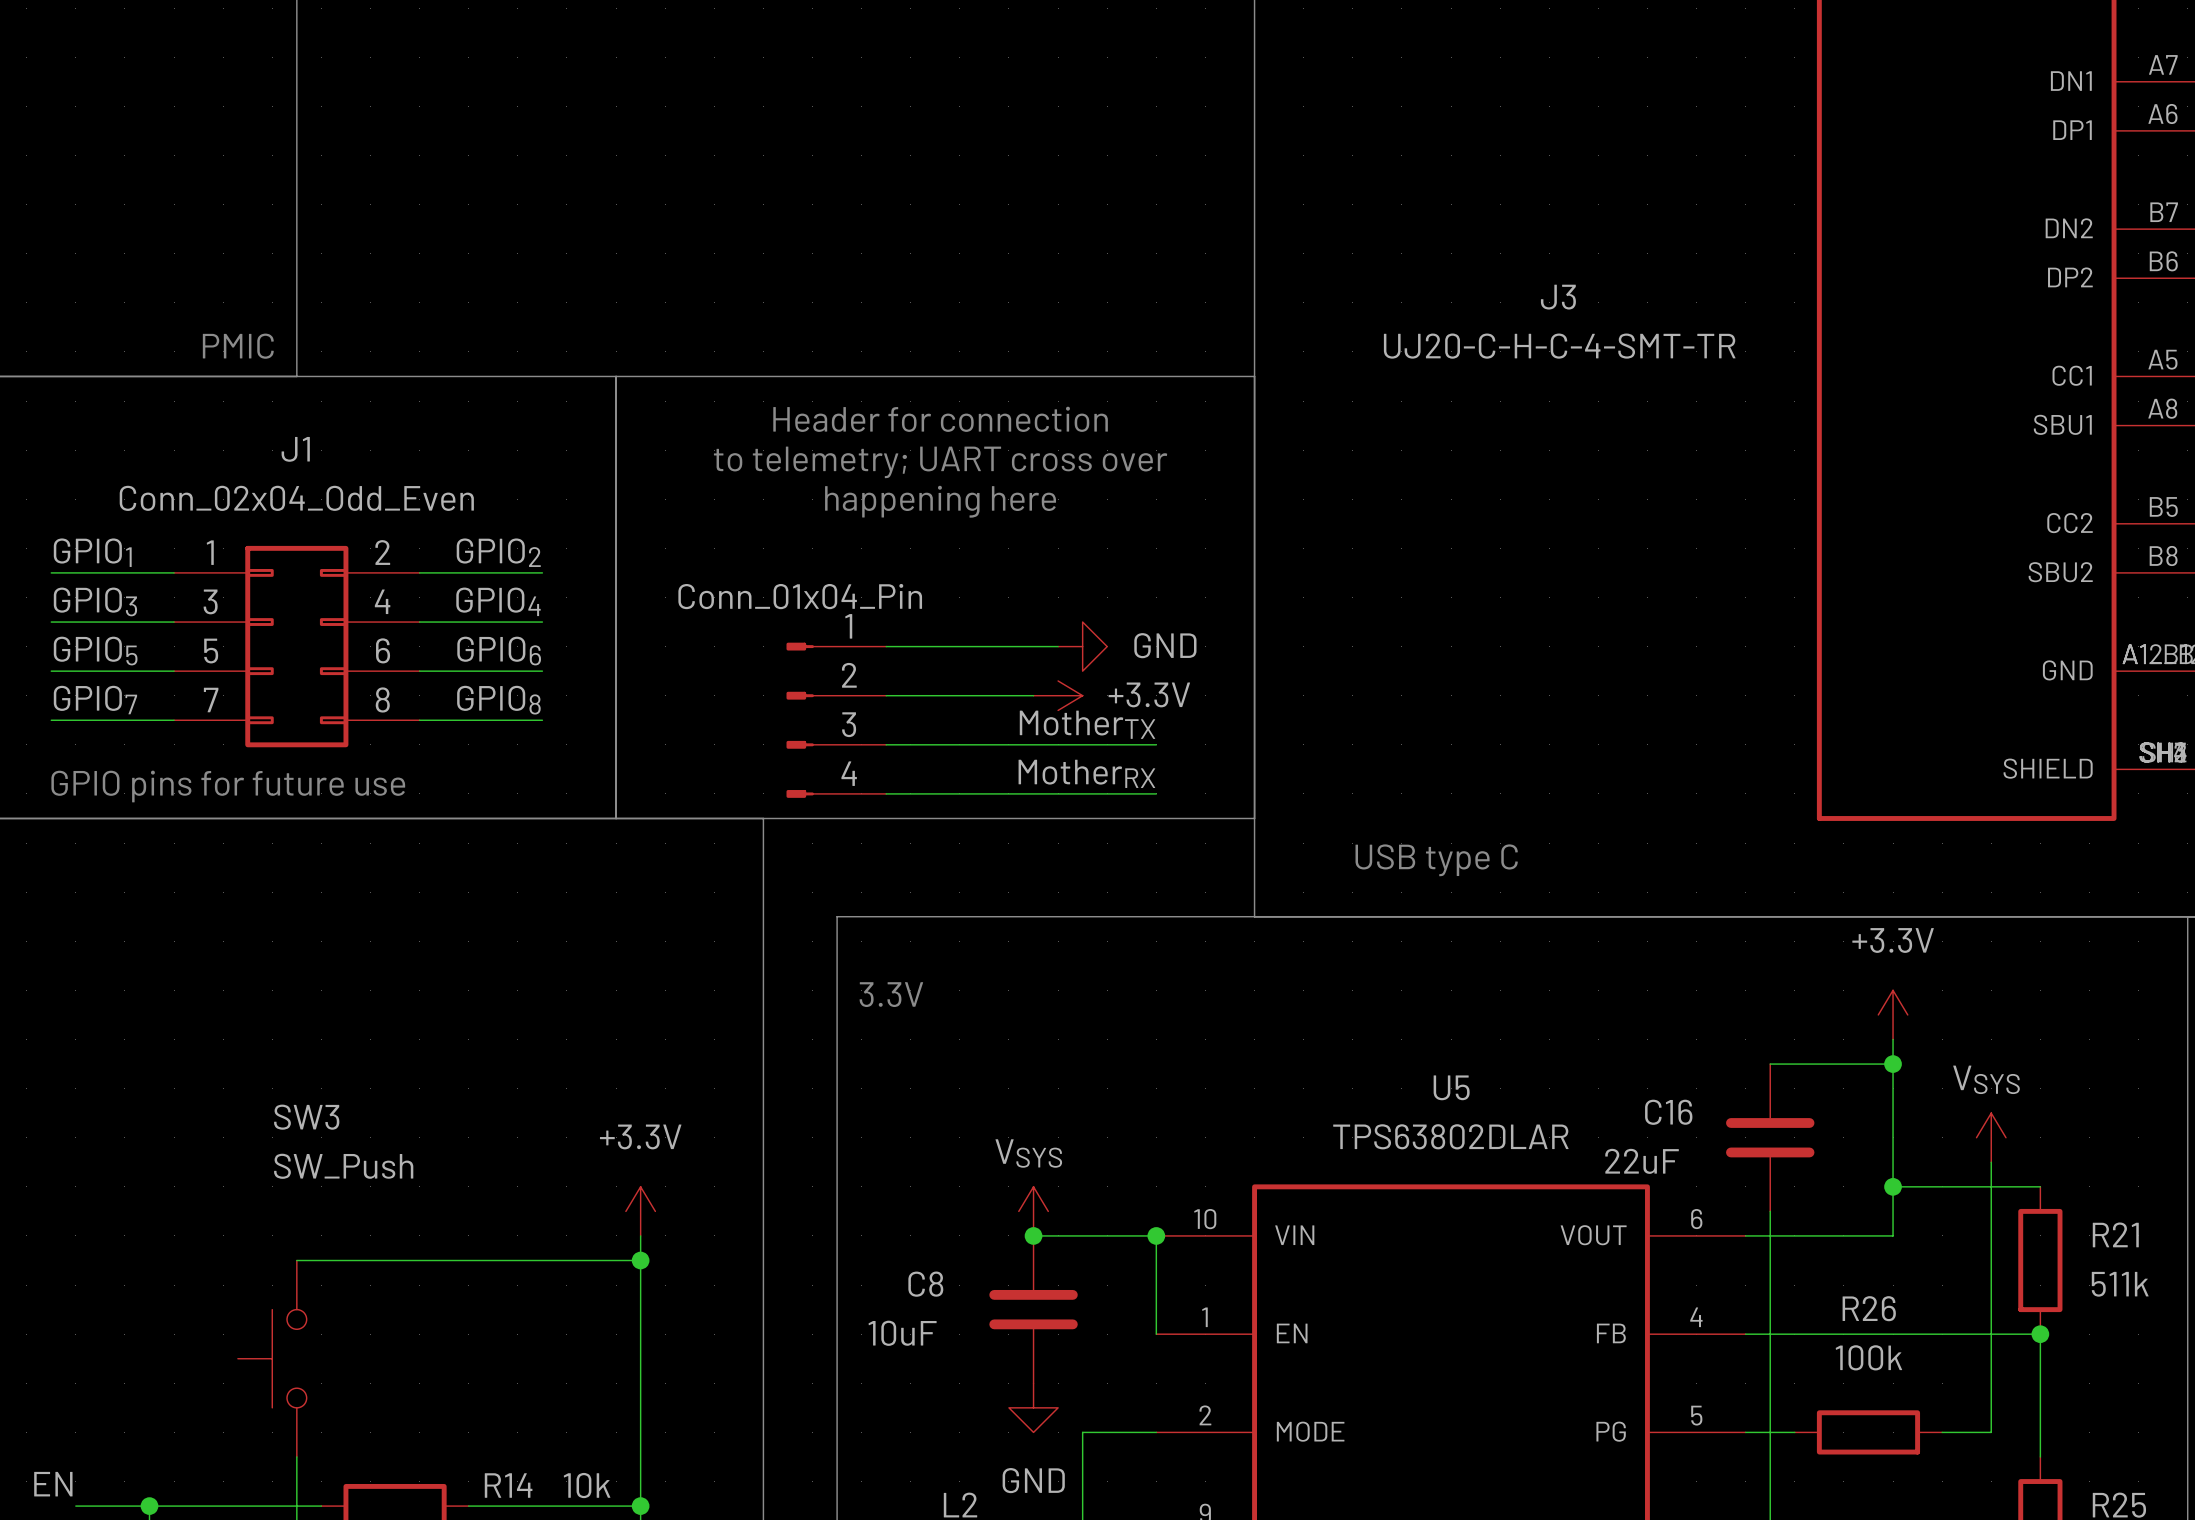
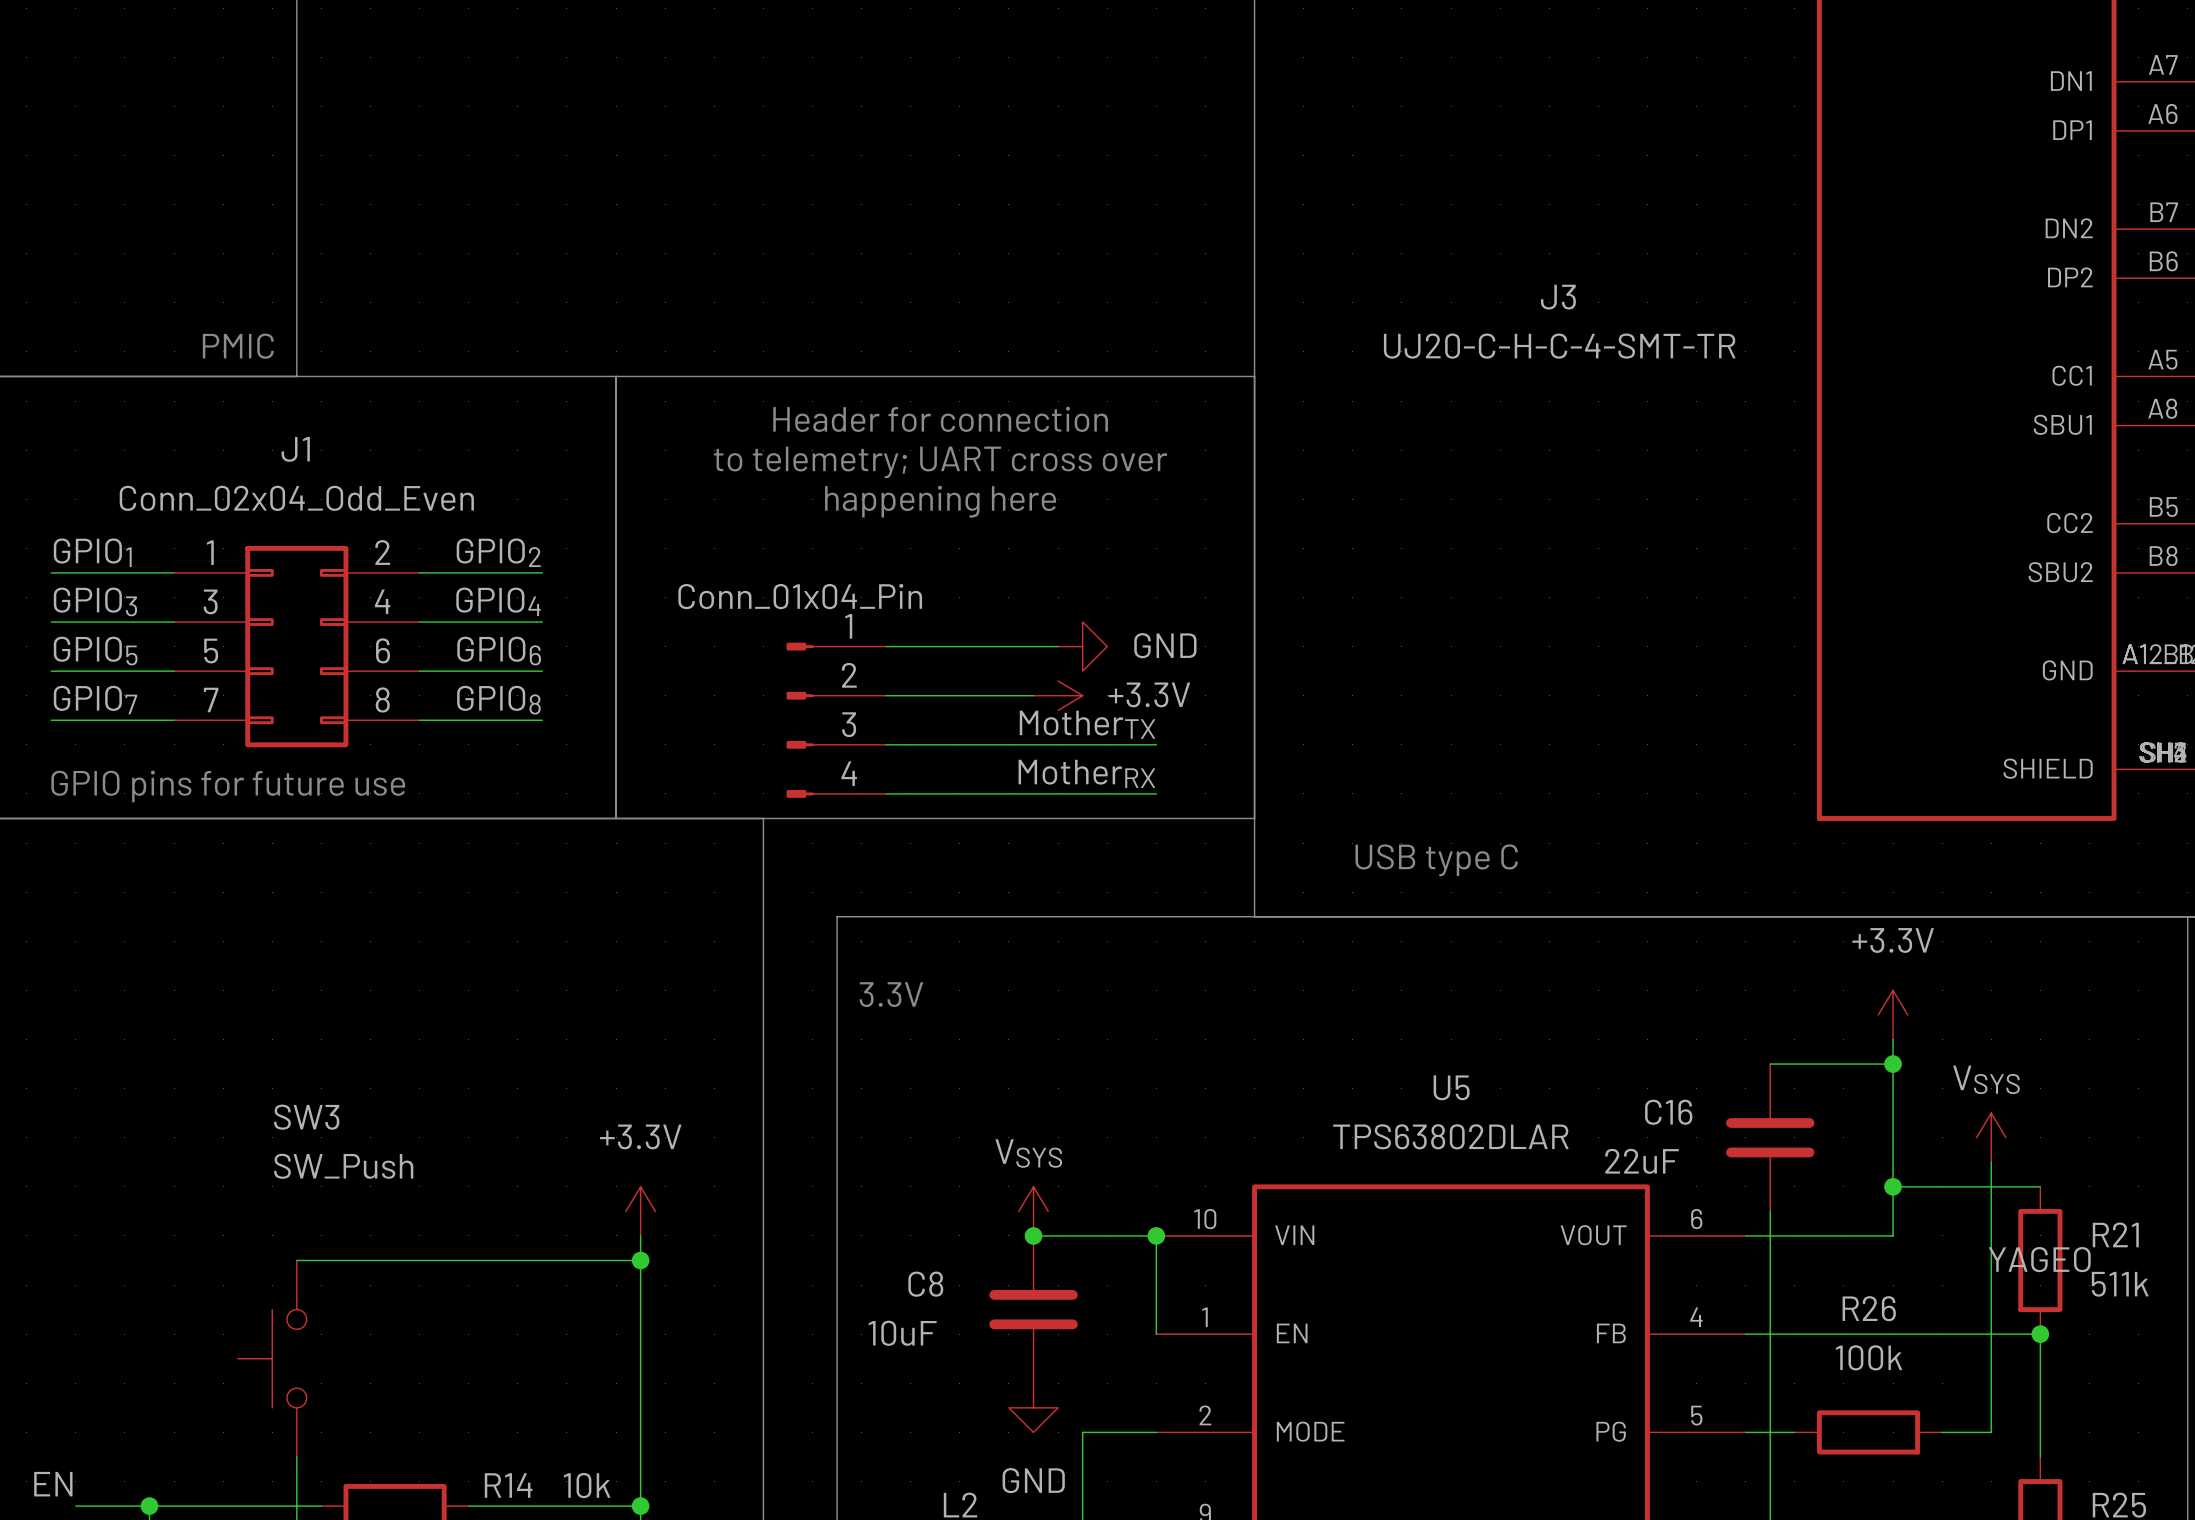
R21 text: none -> YAGEO (2039, 1259)

